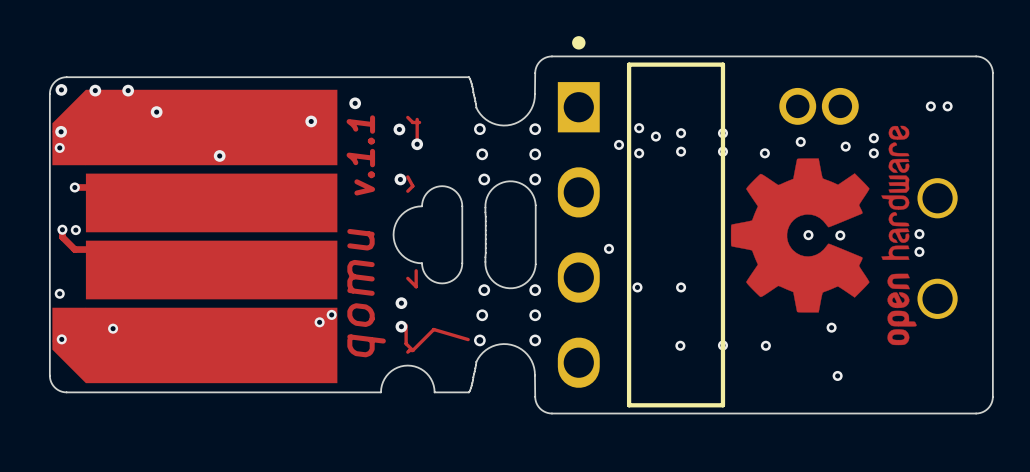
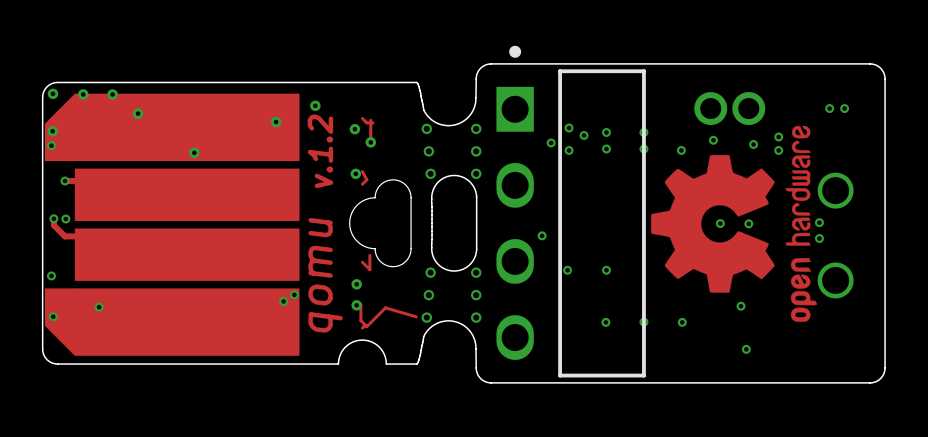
text: v.1.1 (360, 155) -> v.1.2 (320, 151)

